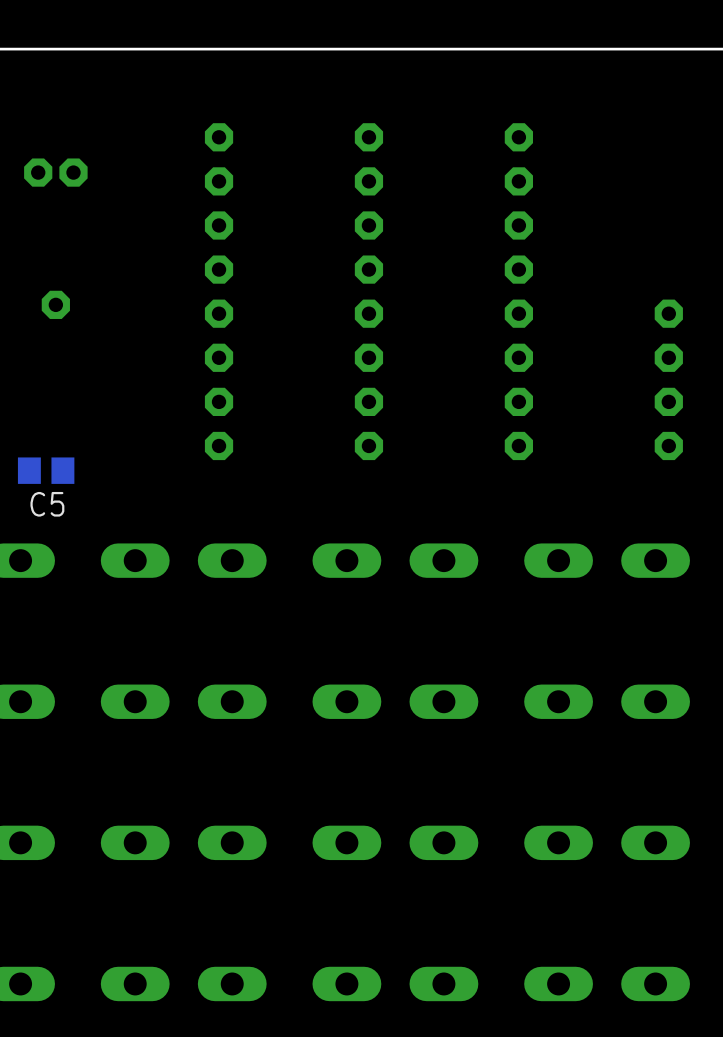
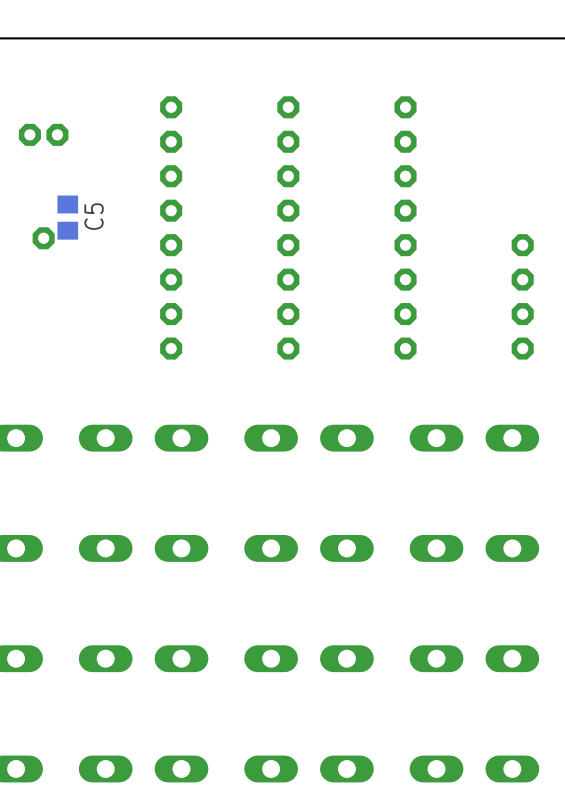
C5 rotation: 0° (46, 470) -> 90° clockwise (67, 217)
C5 position: (46, 470) -> (67, 217)
C5 name position: C5 (47, 504) -> C5 (94, 216)

